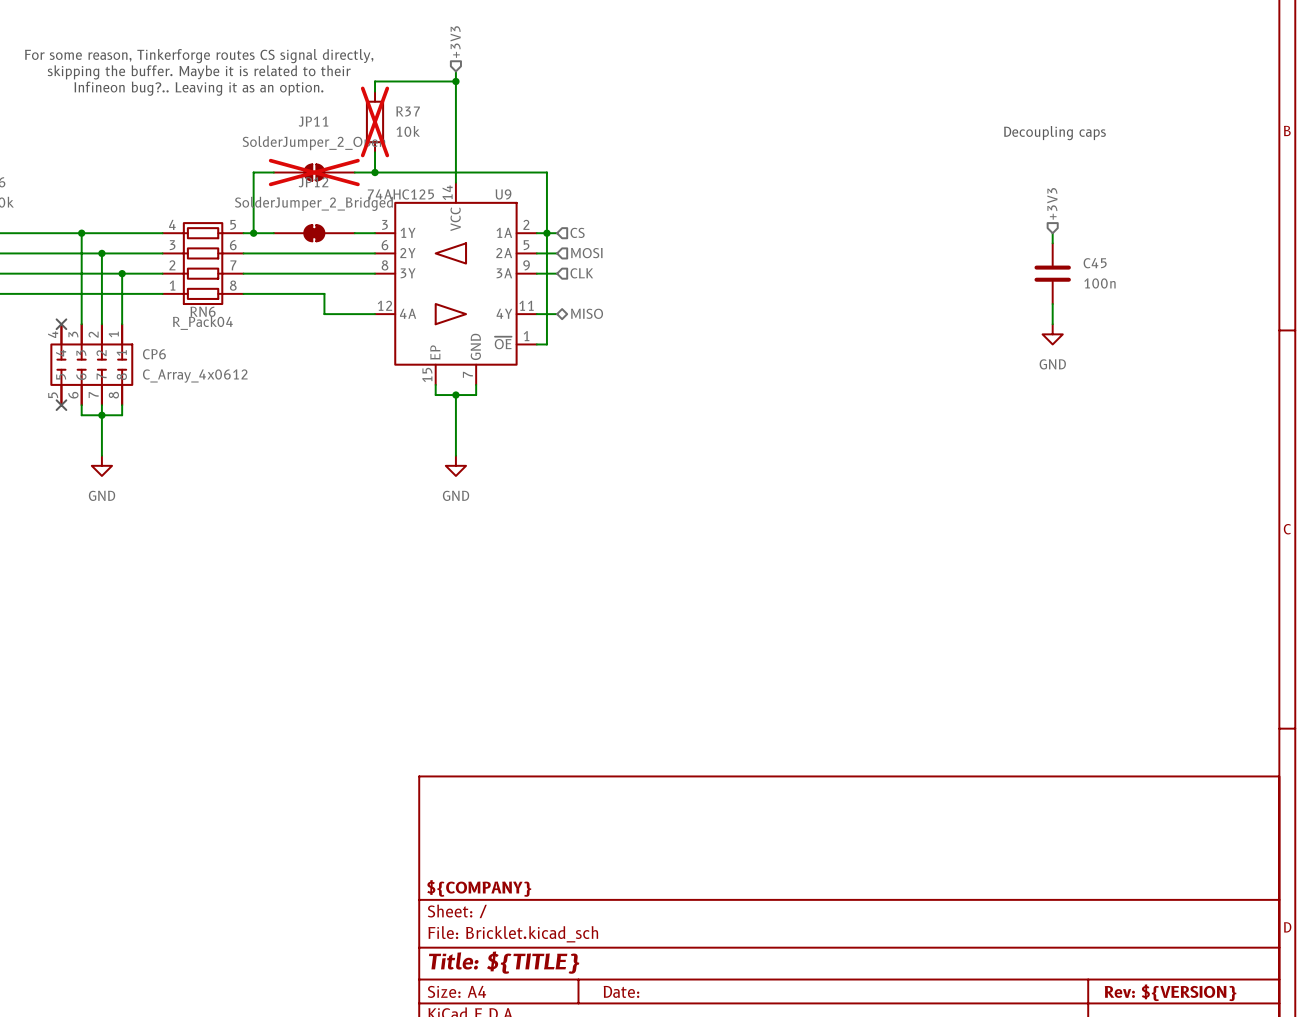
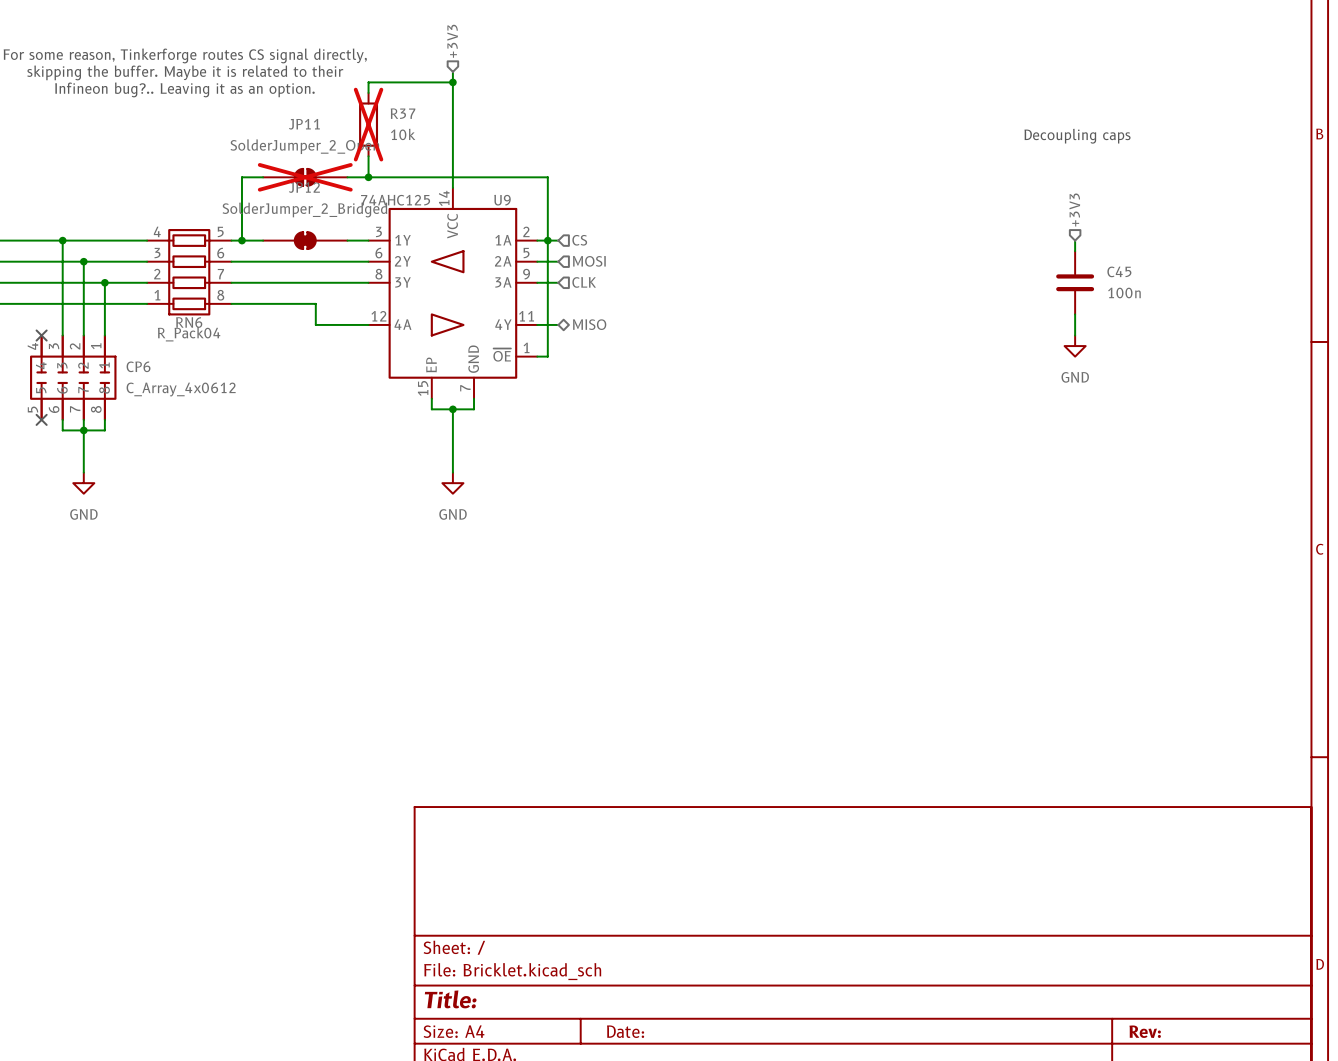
title block: ${COMPANY} (479, 888) -> none
title block: Title: ${TITLE} (504, 962) -> Title: (450, 999)
title block: Rev: ${VERSION} (1170, 992) -> Rev: (1145, 1031)

